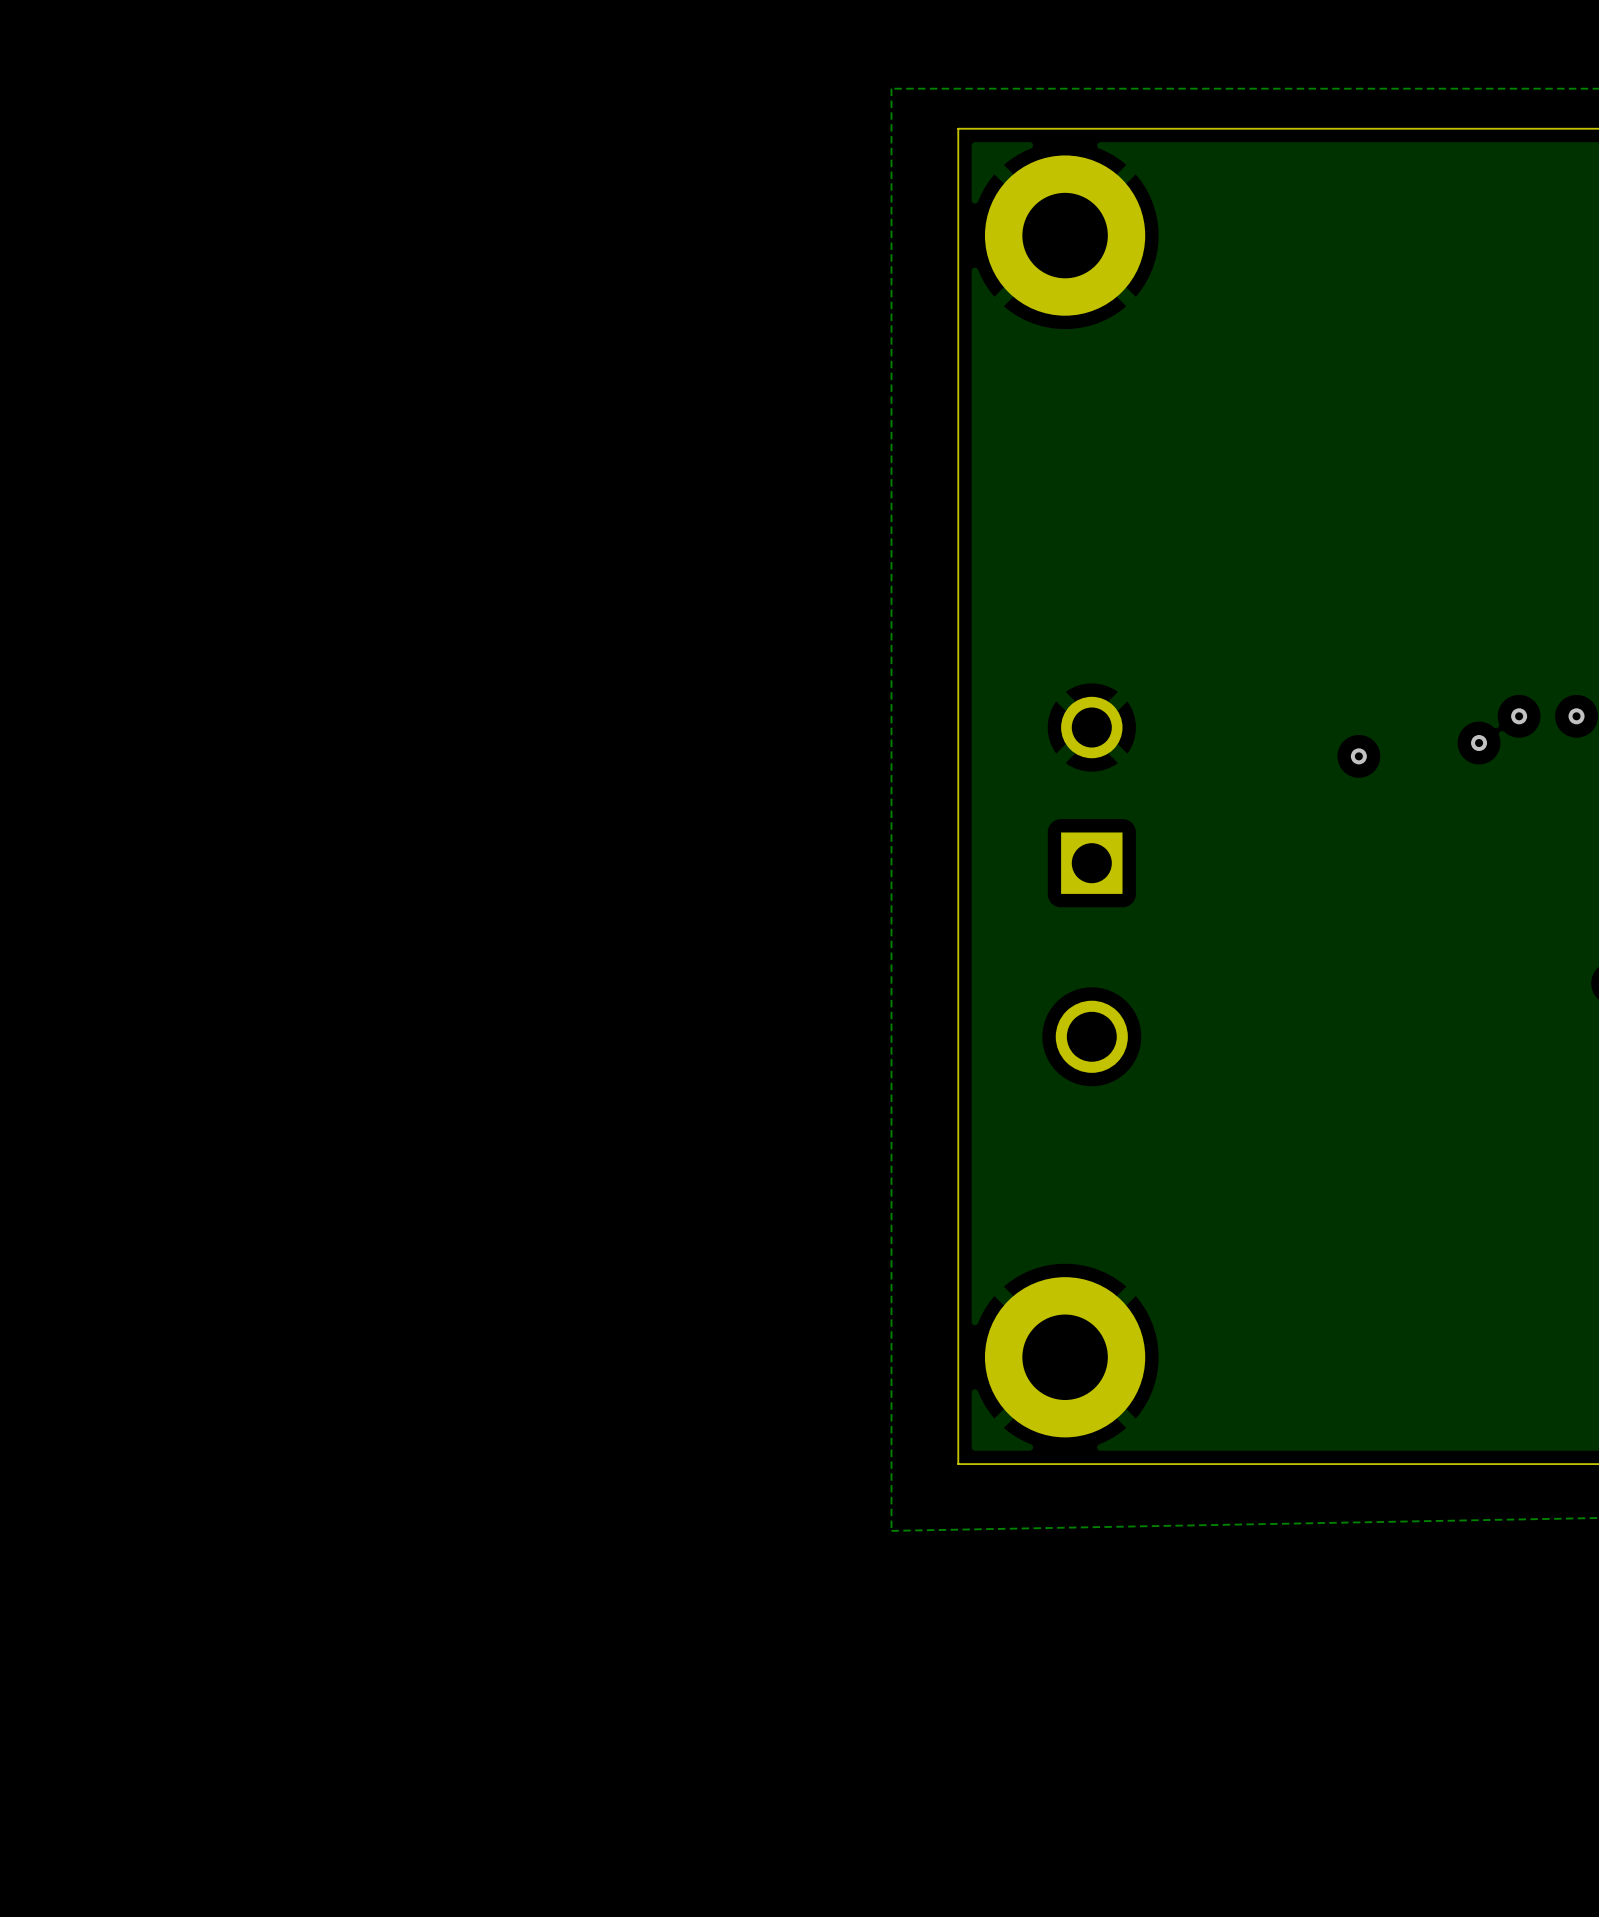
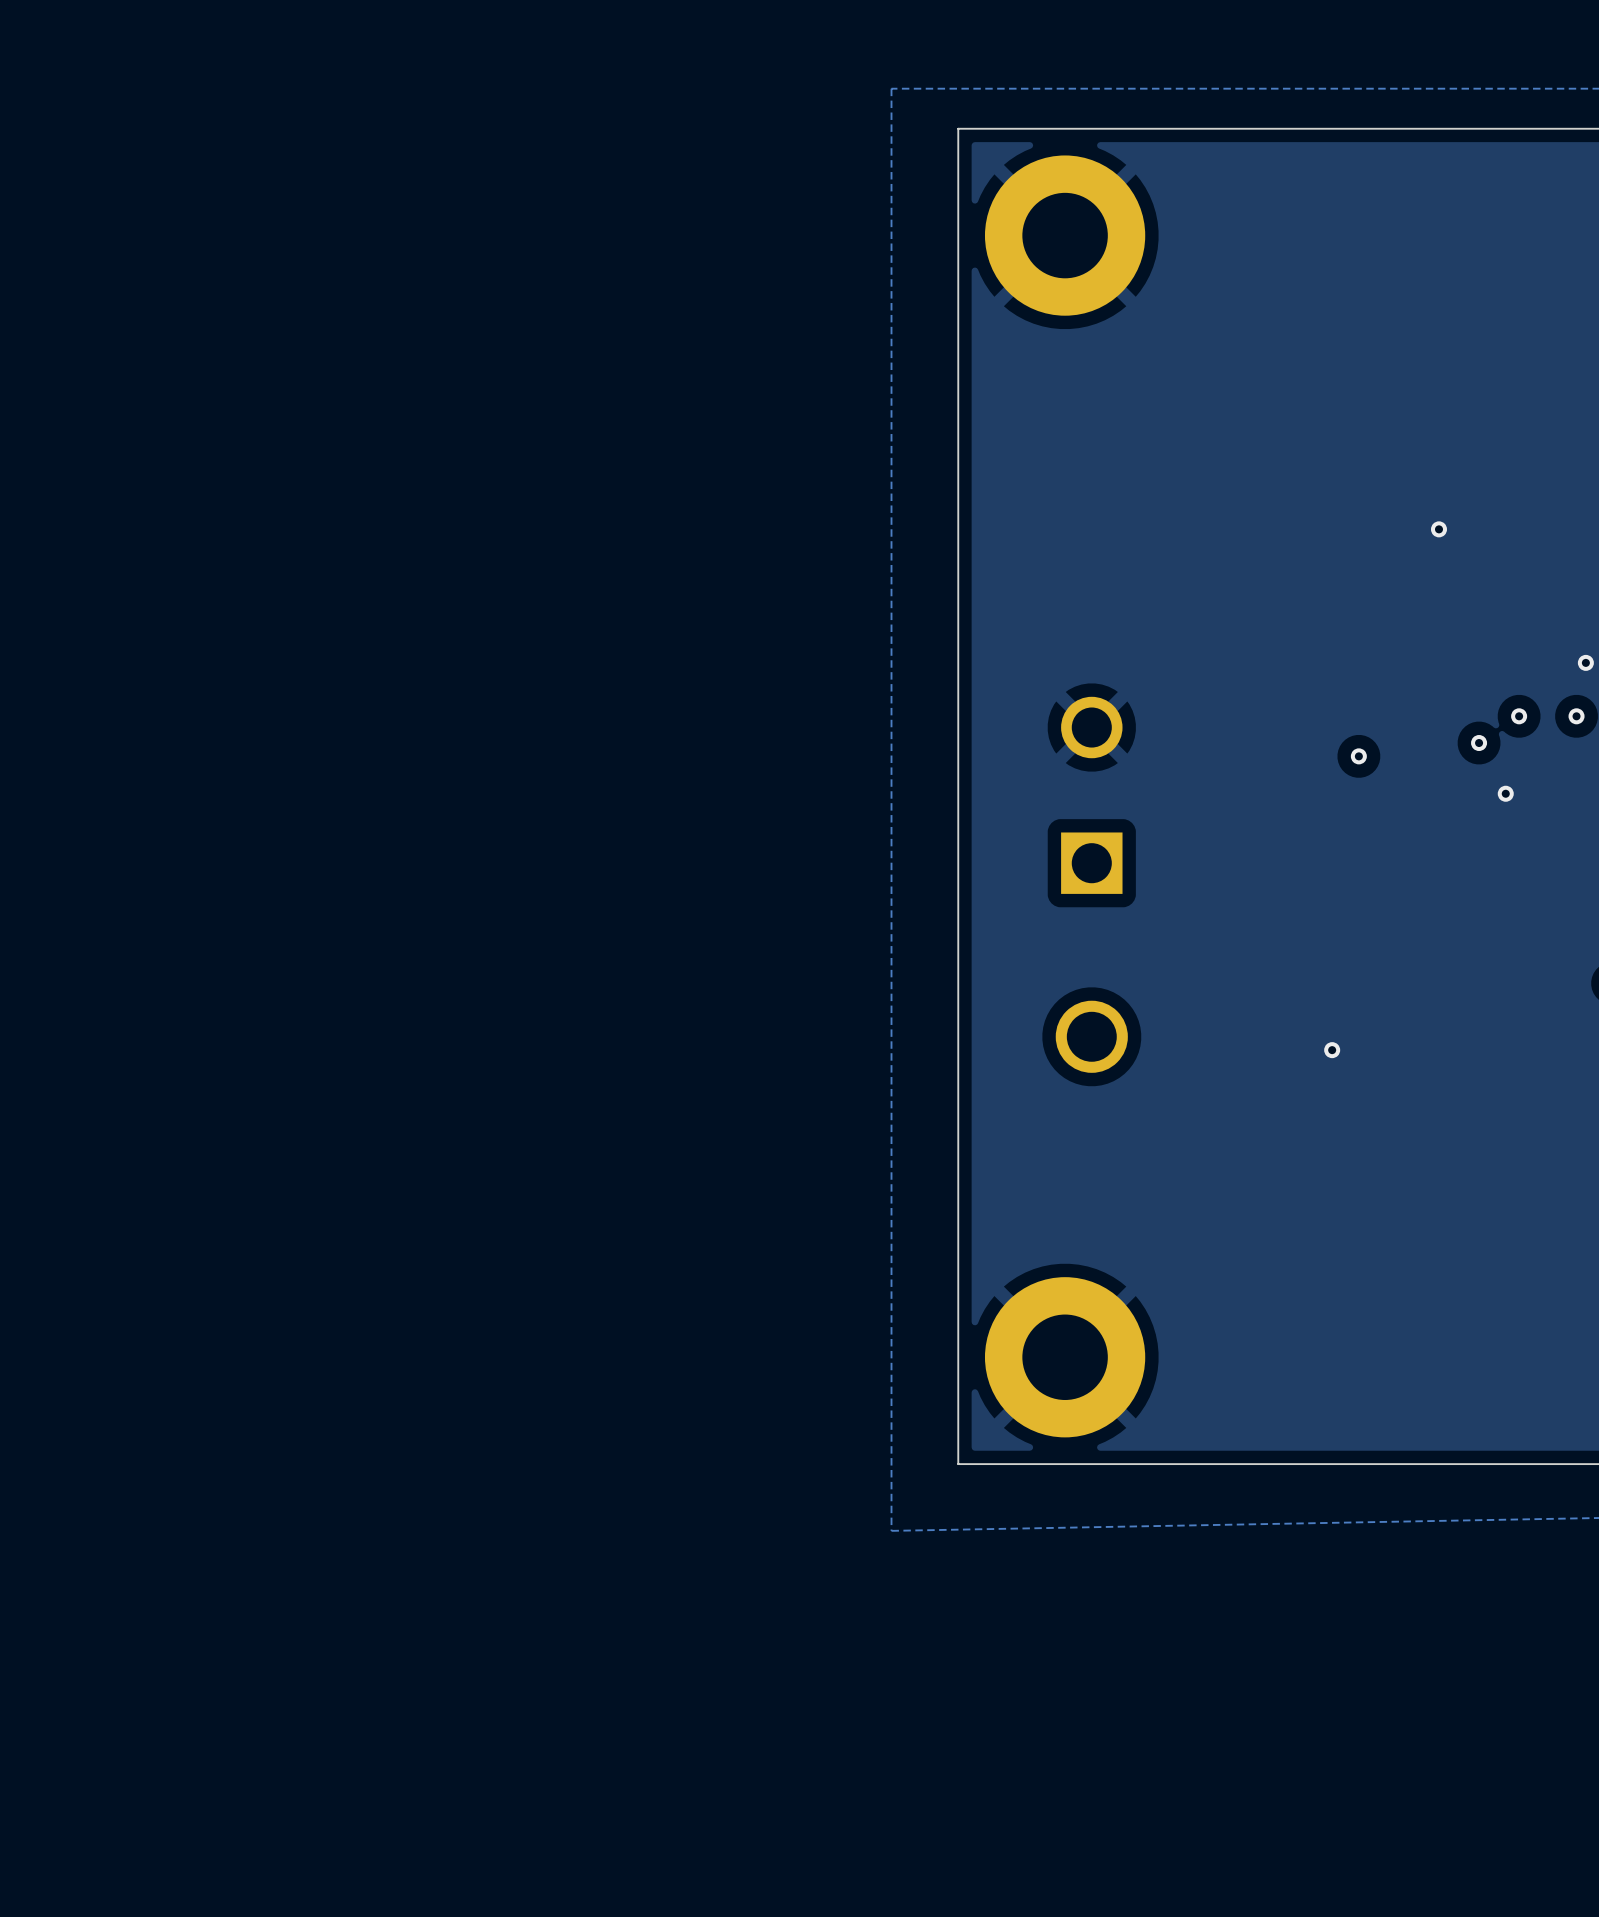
via: none -> (1438, 529)
via: none -> (1585, 662)
via: none -> (1505, 793)
via: none -> (1332, 1050)

